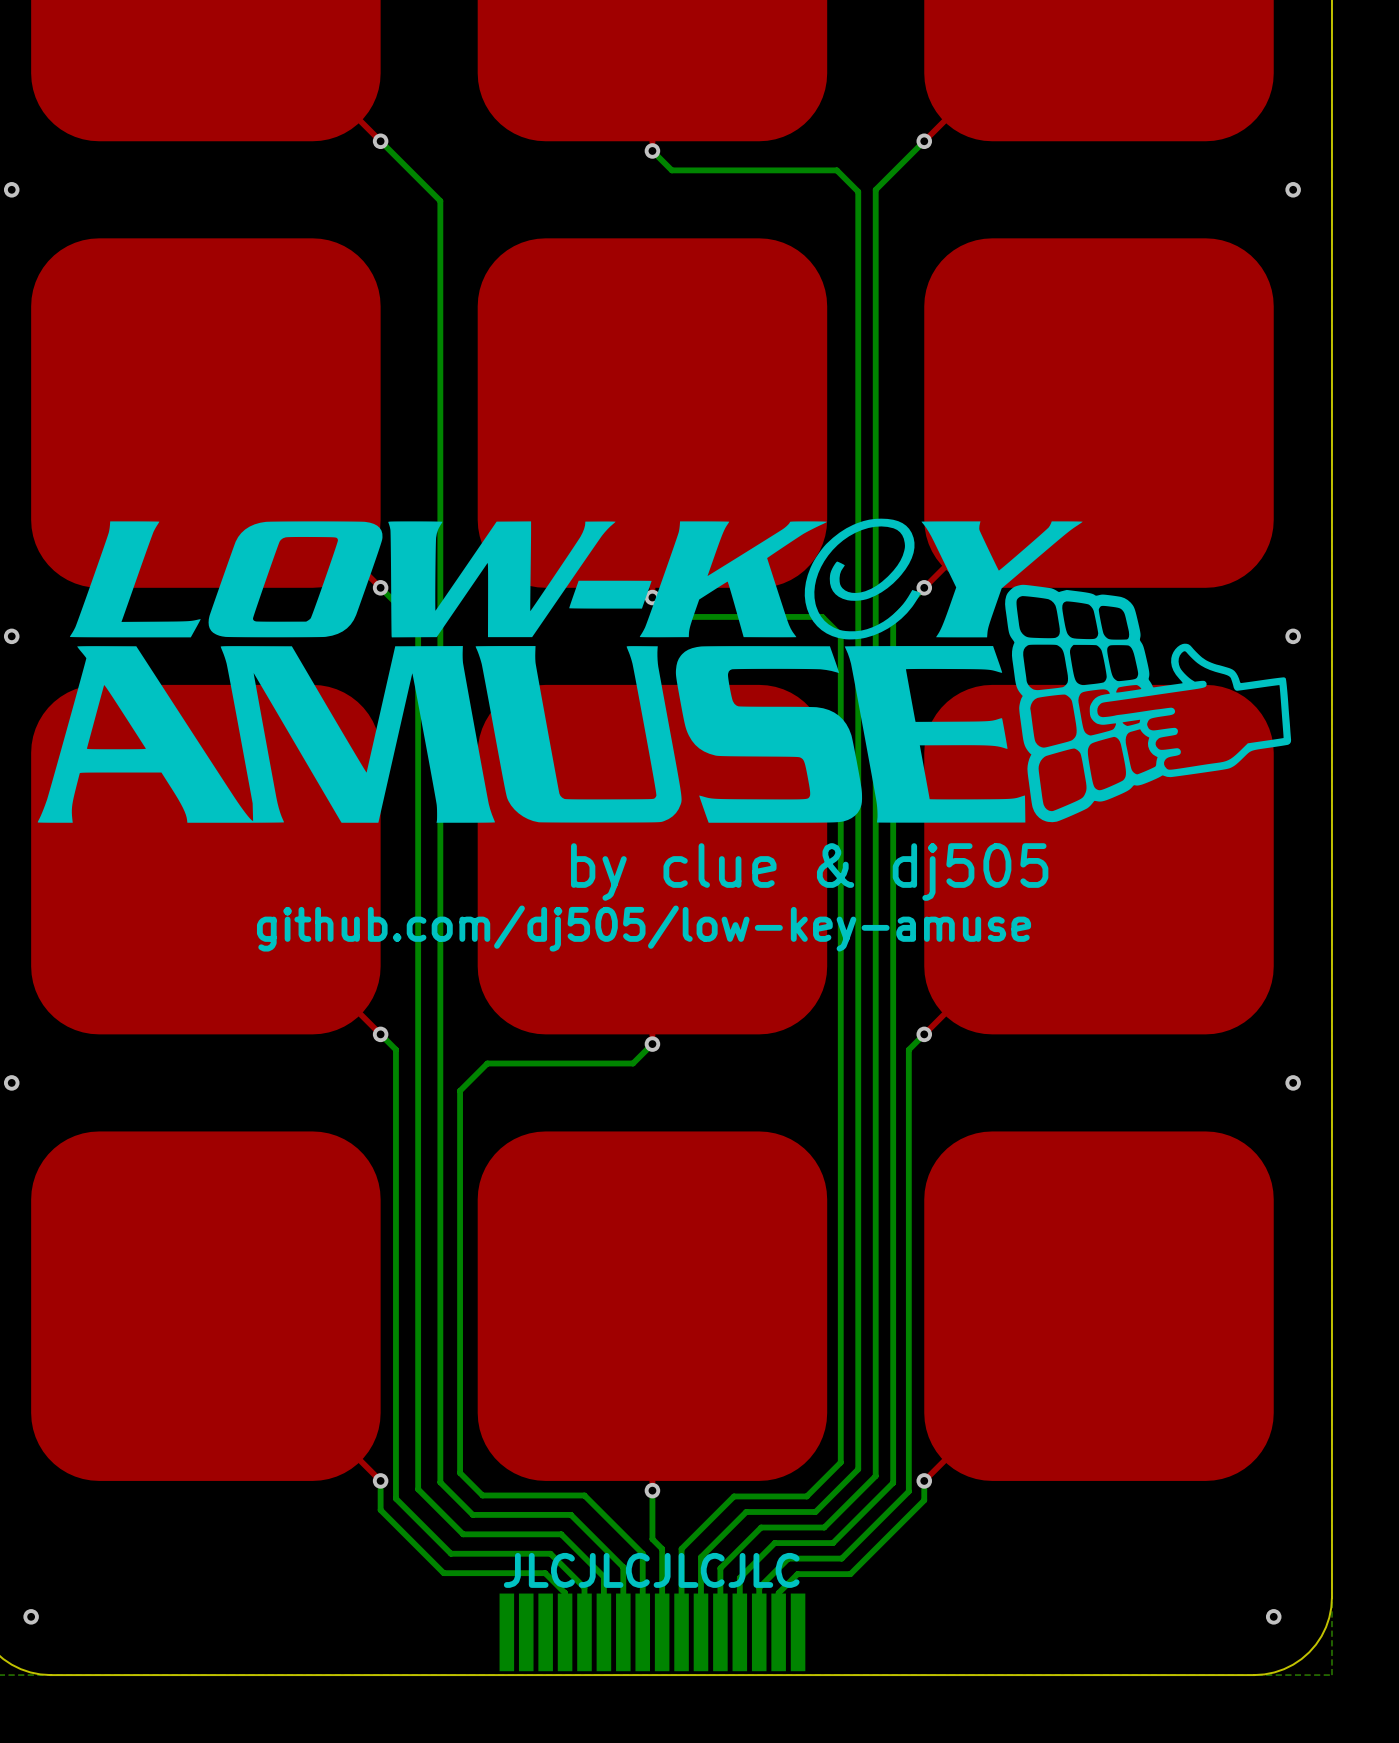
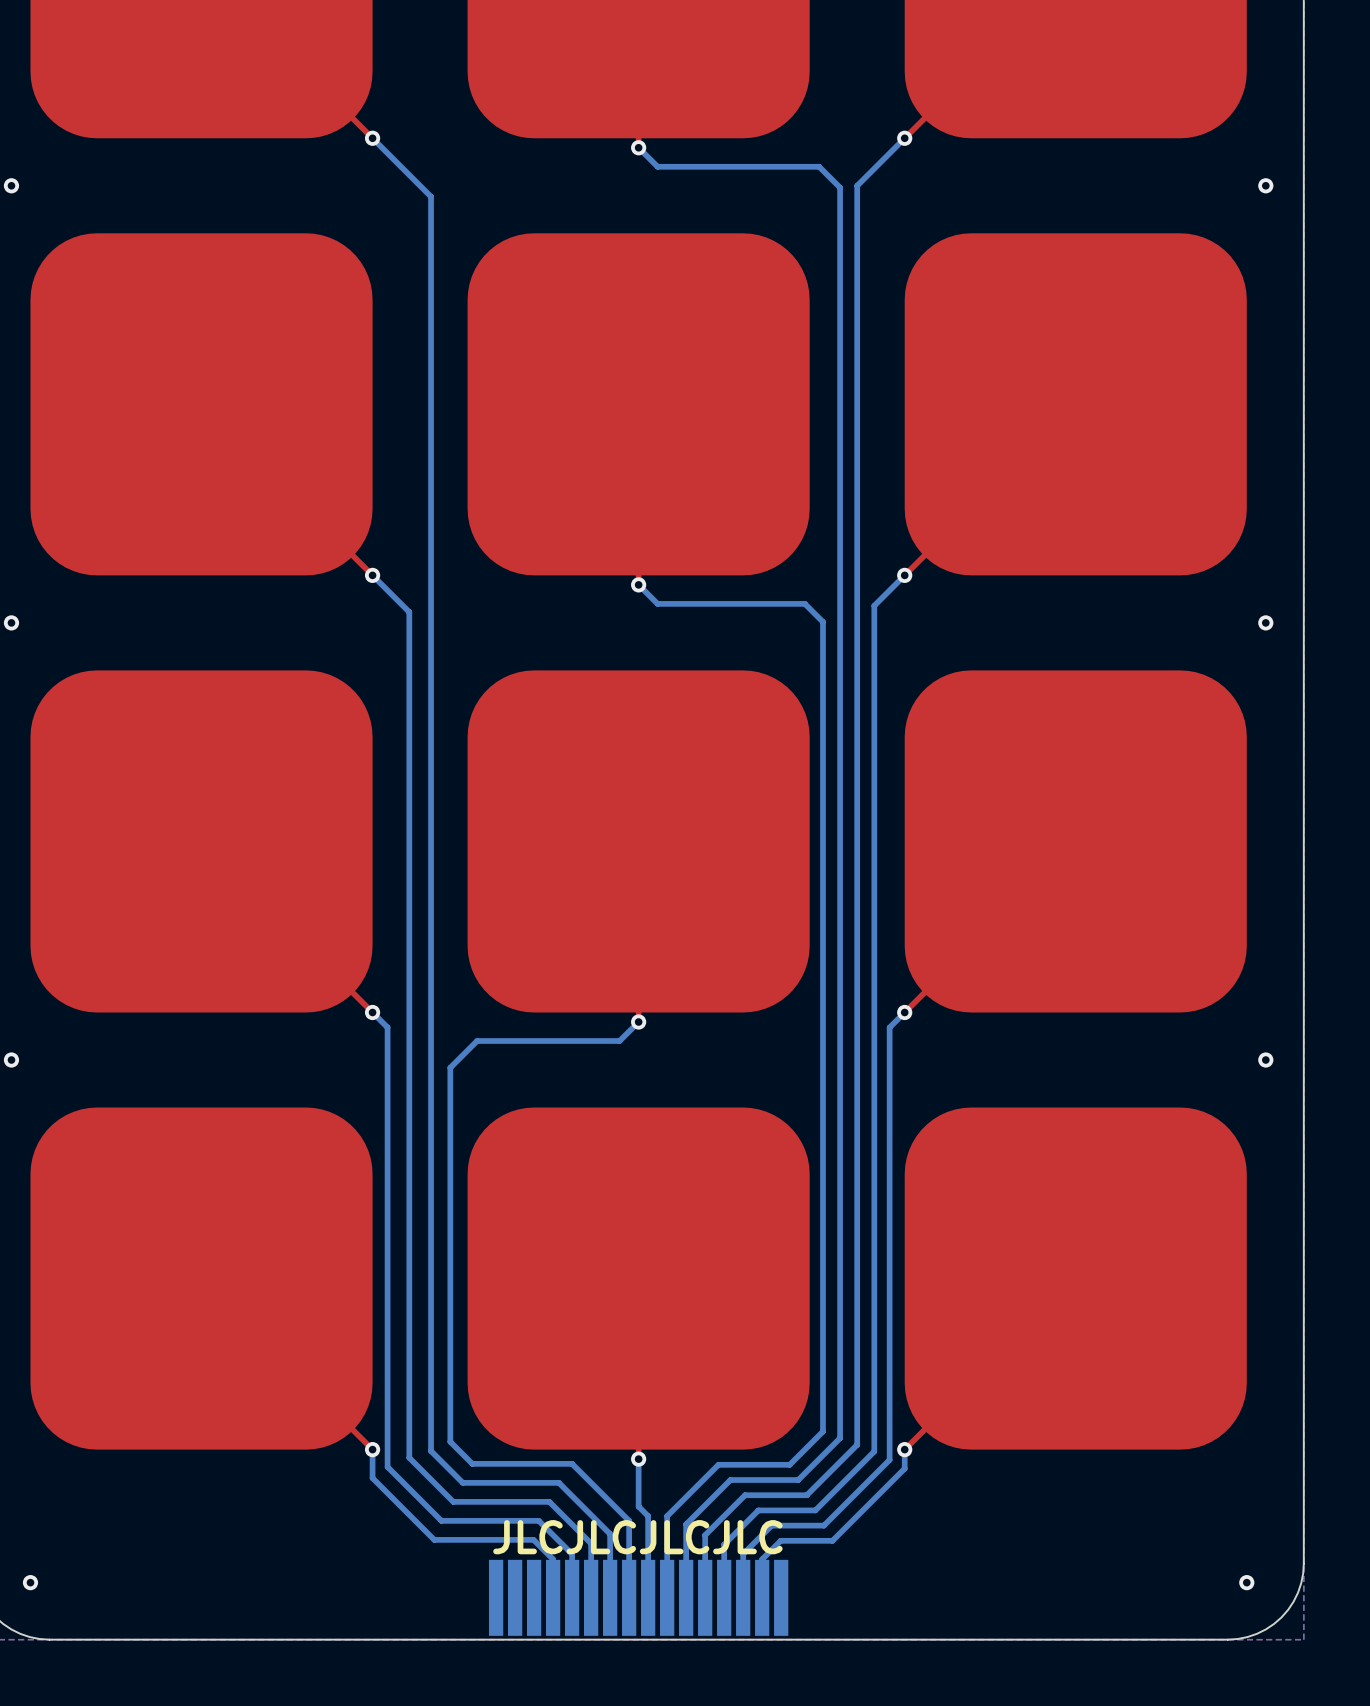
drawing: [37, 518, 1292, 823] -> none
text: by clue & dj505 (809, 872) -> none
text: github.com/dj505/low-key-amuse (644, 928) -> none

